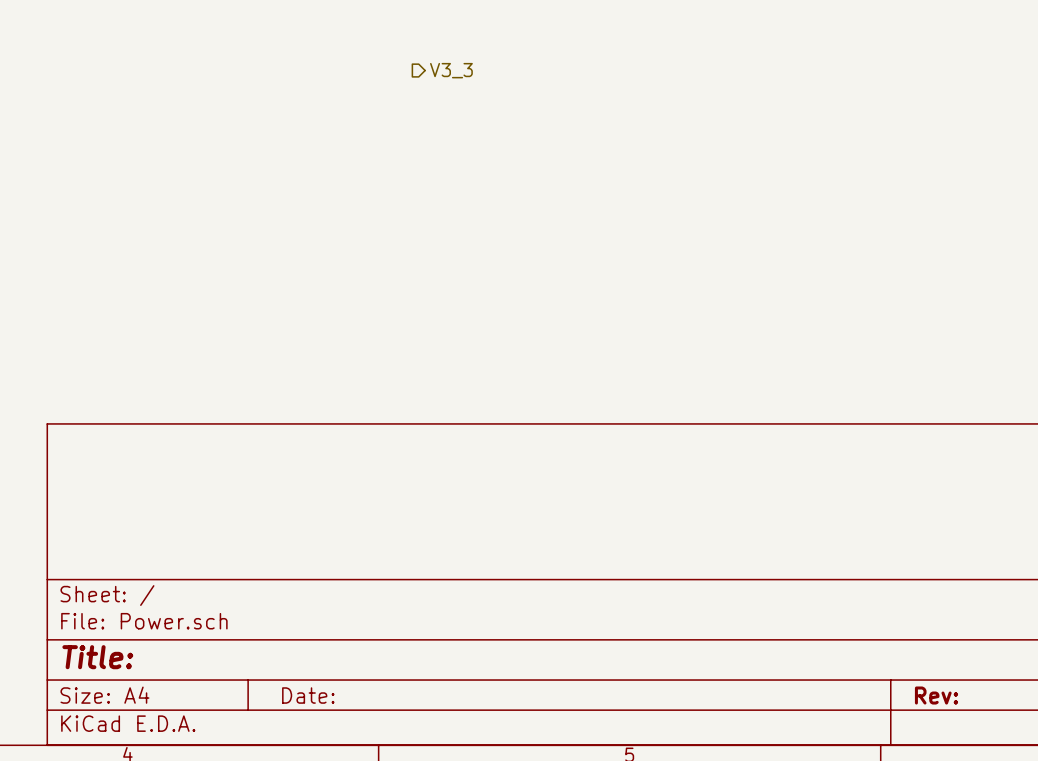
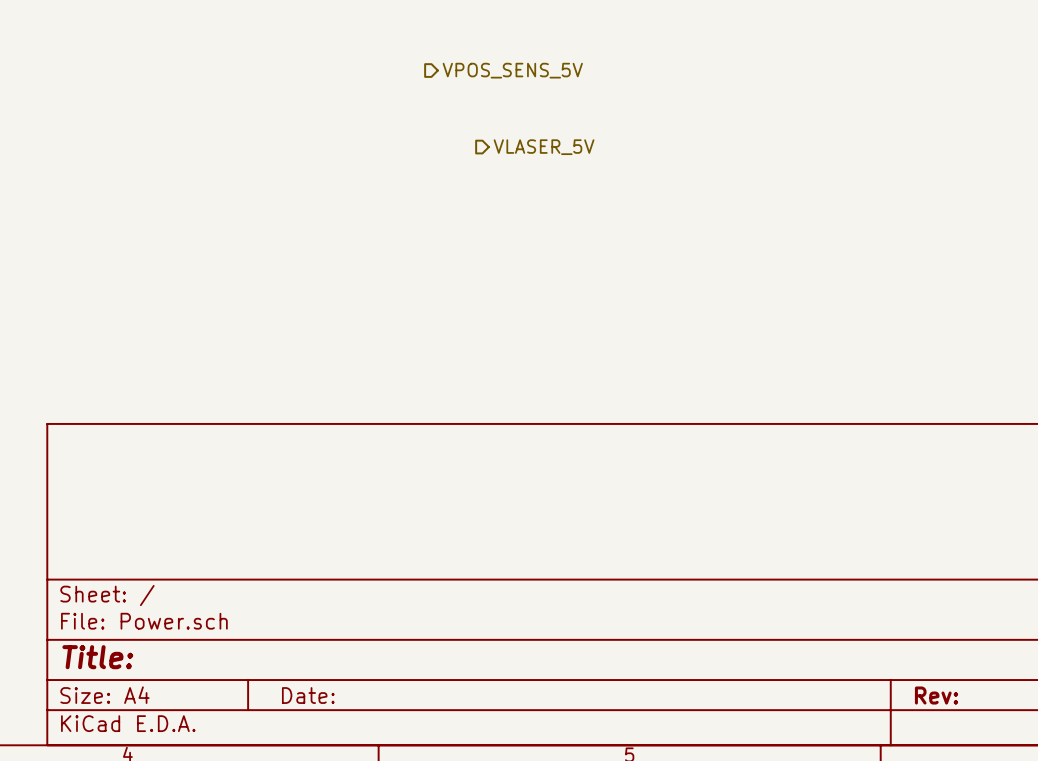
hierarchical label: V3_3 (451, 70) -> none
hierarchical label: none -> VPOS_SENS_5V (512, 70)
hierarchical label: none -> VLASER_5V (544, 147)

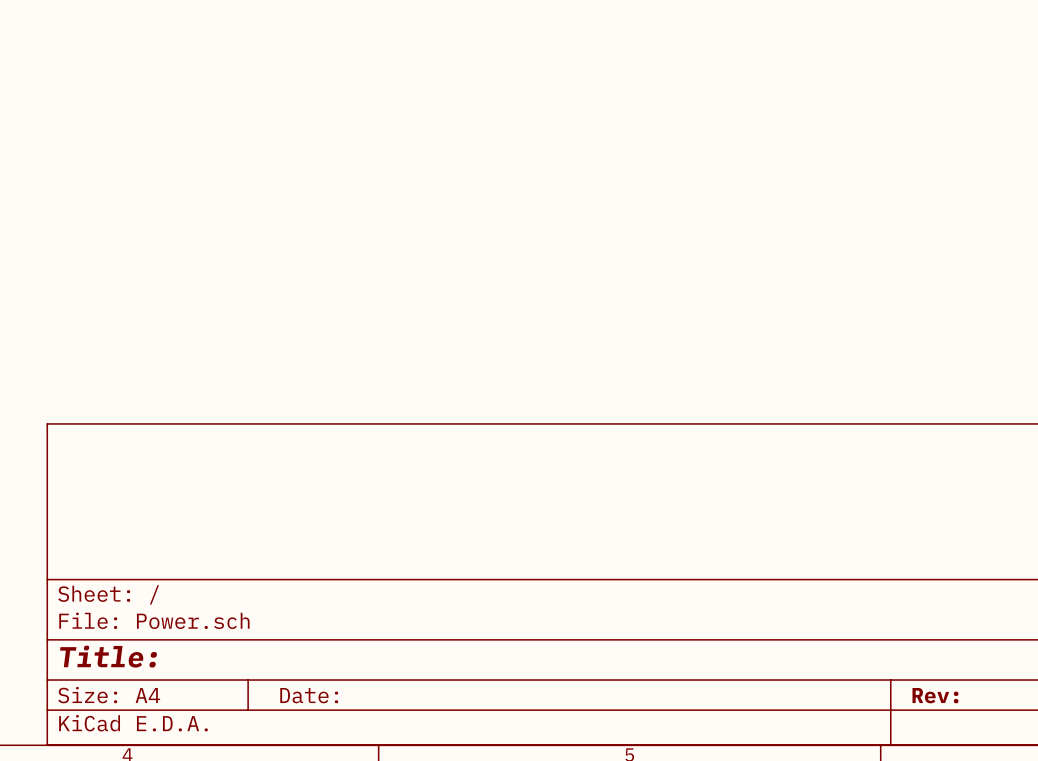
hierarchical label: VPOS_SENS_5V (512, 70) -> none
hierarchical label: VLASER_5V (544, 147) -> none

